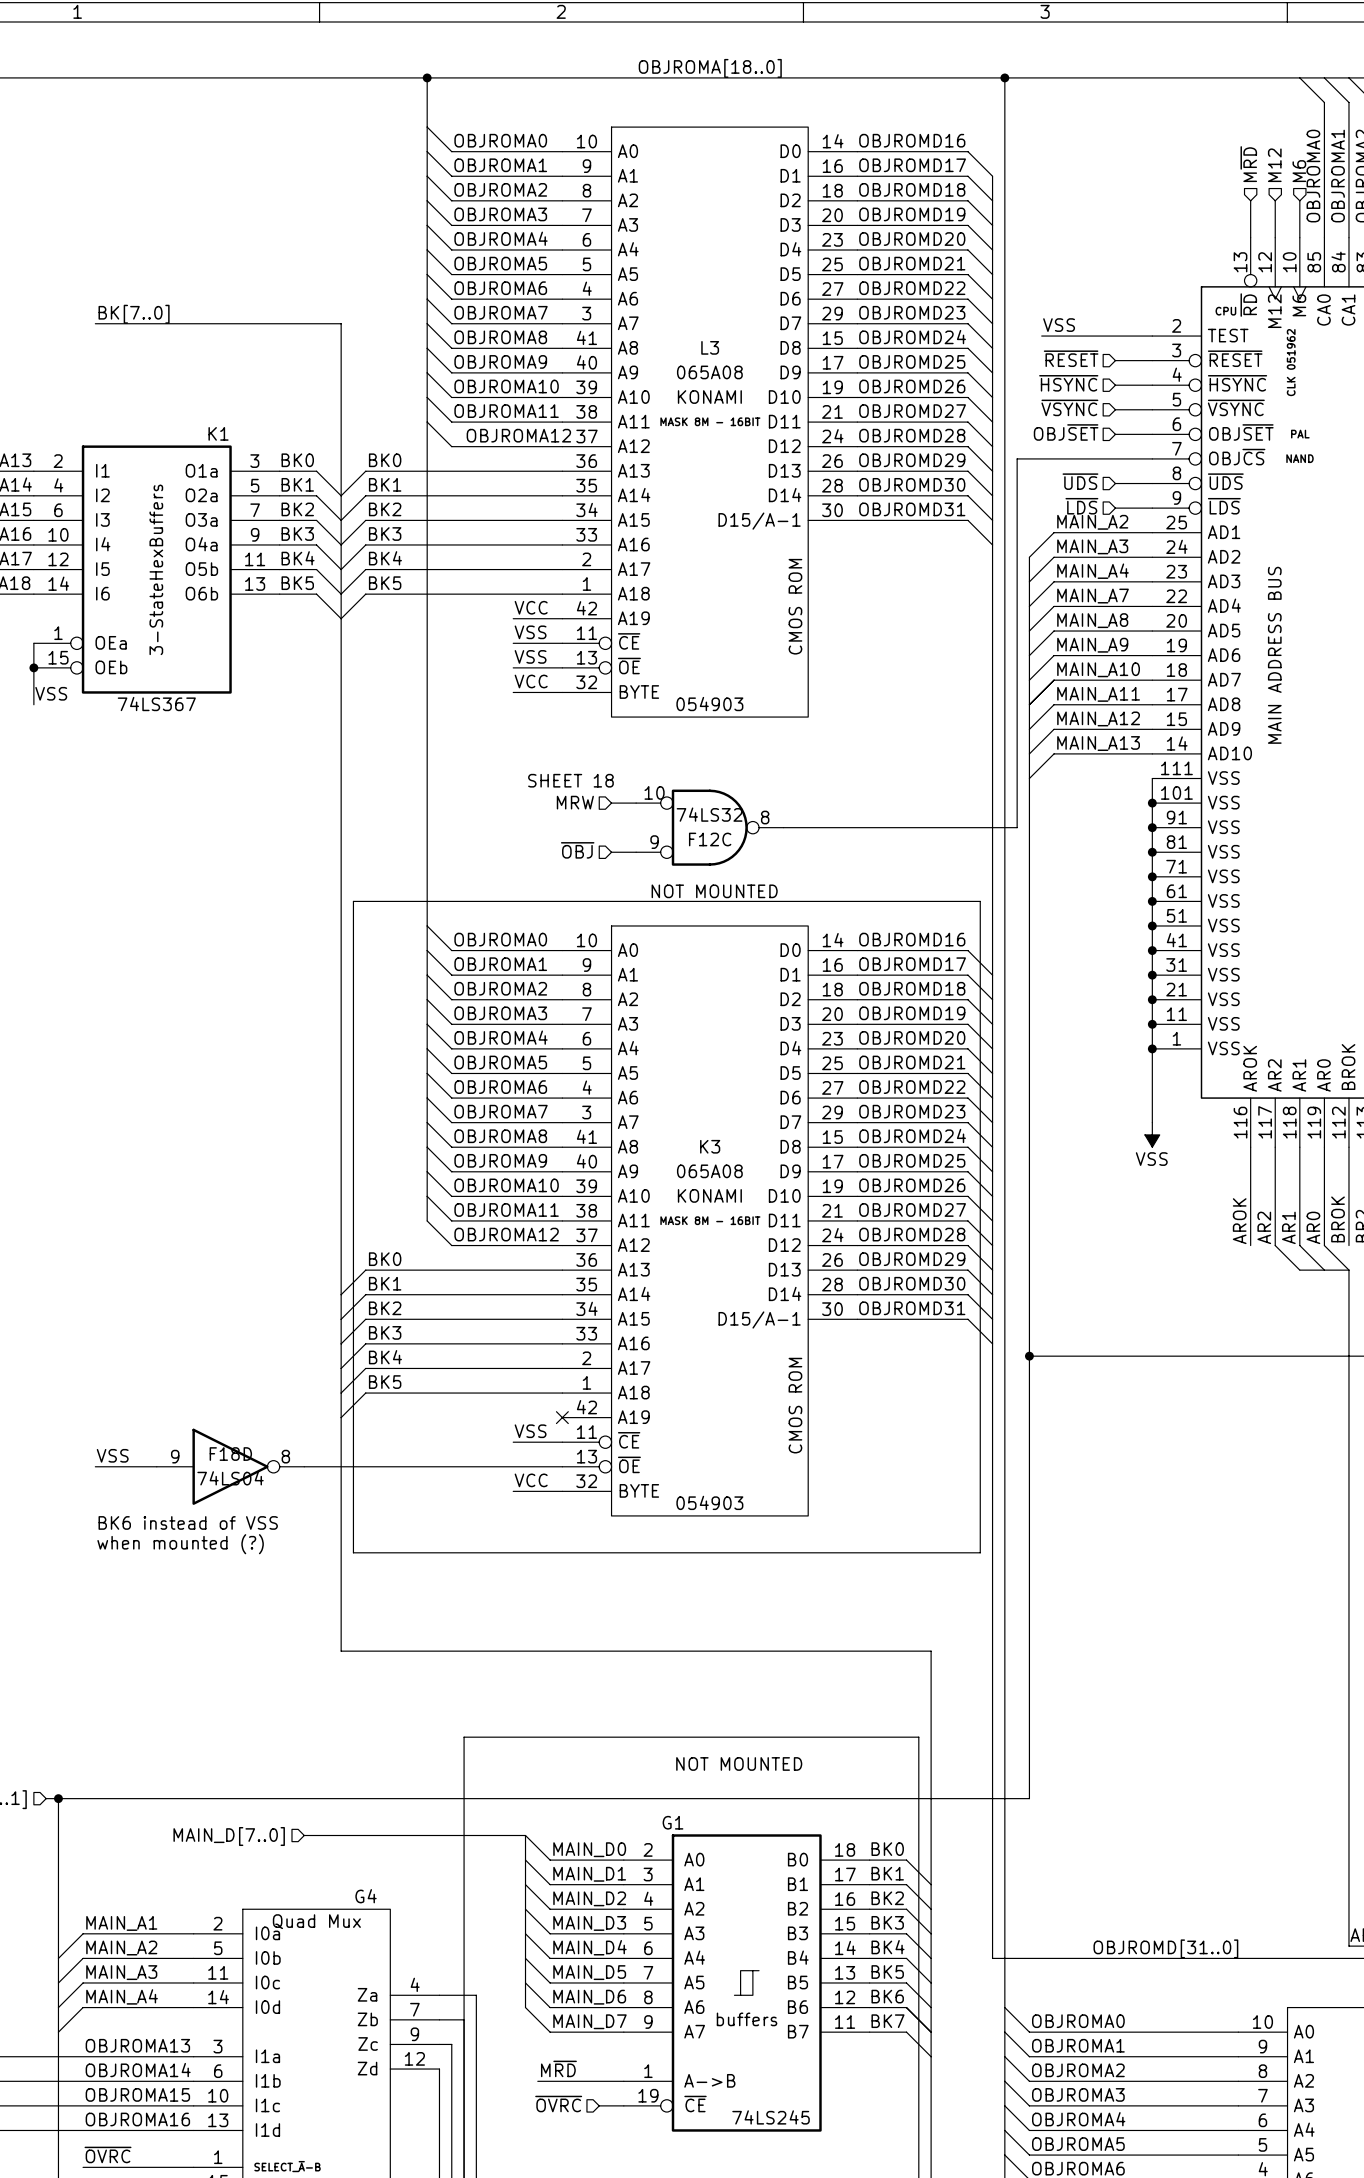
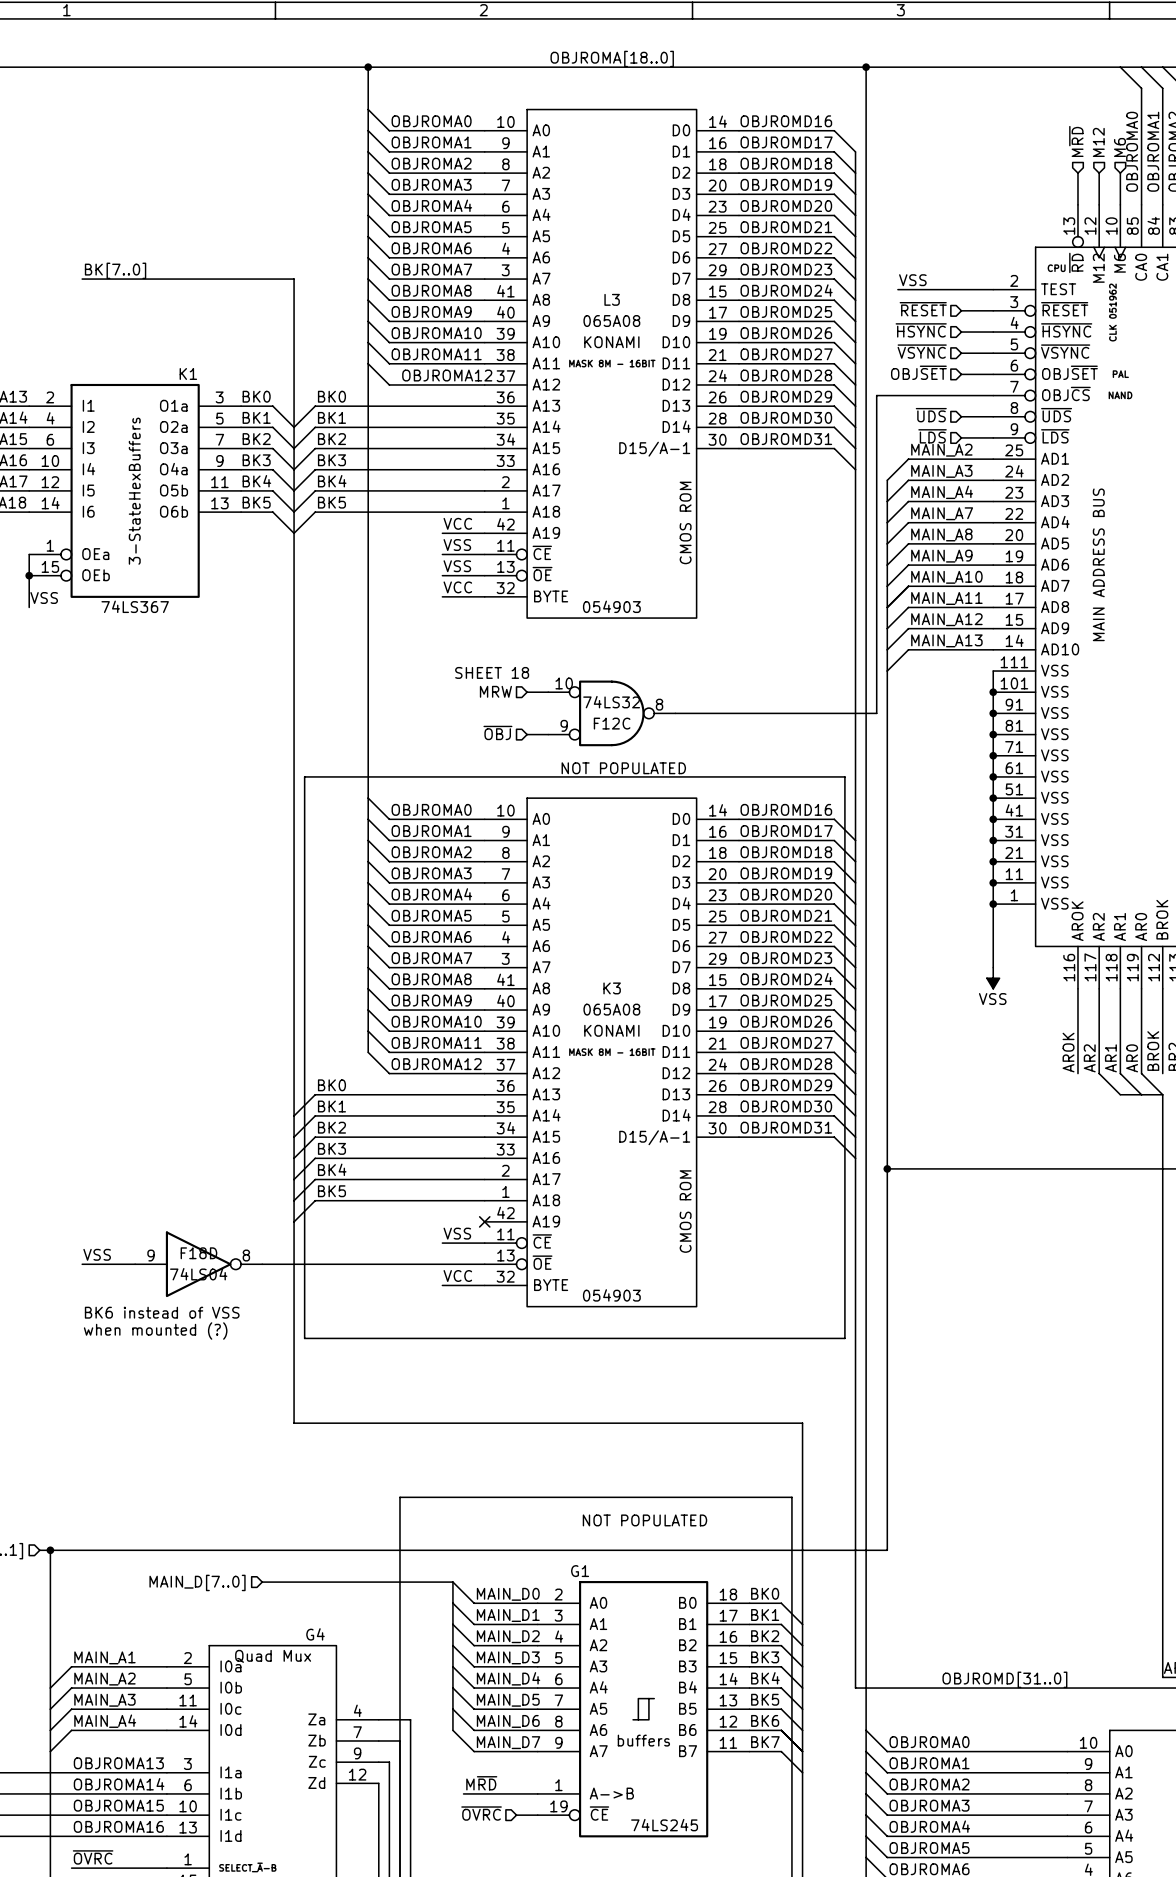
text: NOT MOUNTED (714, 891) -> NOT POPULATED (623, 768)
text: NOT MOUNTED (739, 1763) -> NOT POPULATED (644, 1520)

